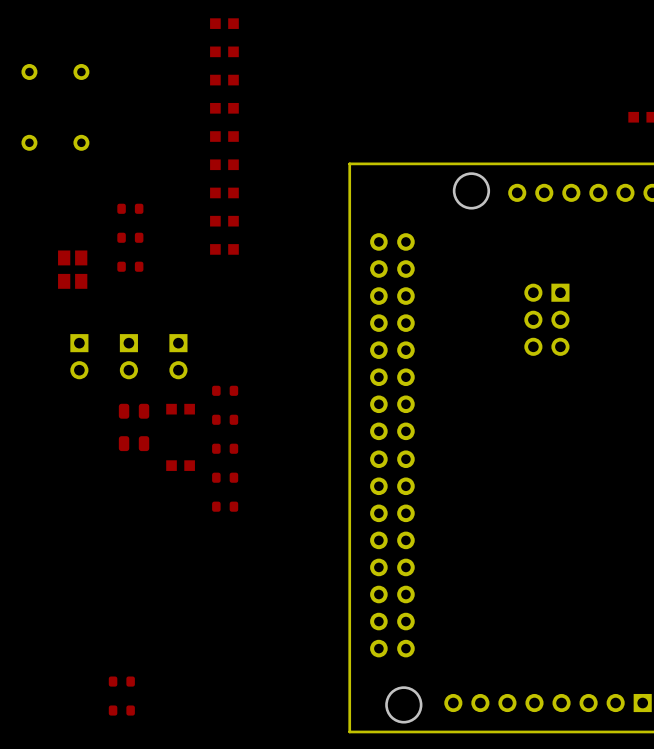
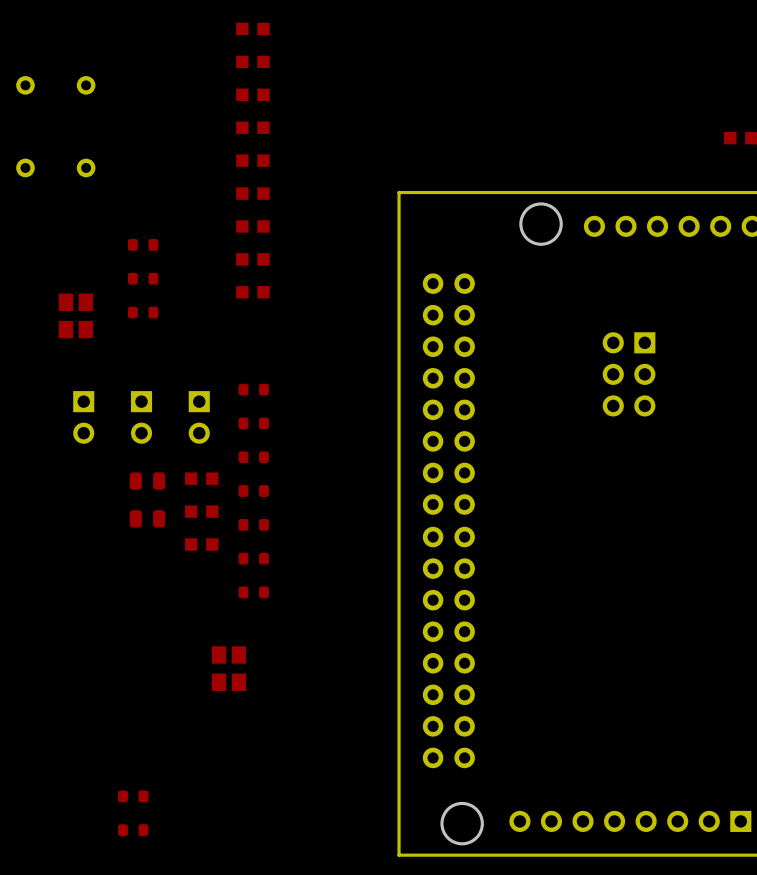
part: none -> (253, 389)
part: none -> (253, 423)
part: none -> (201, 511)
part: none -> (228, 668)

